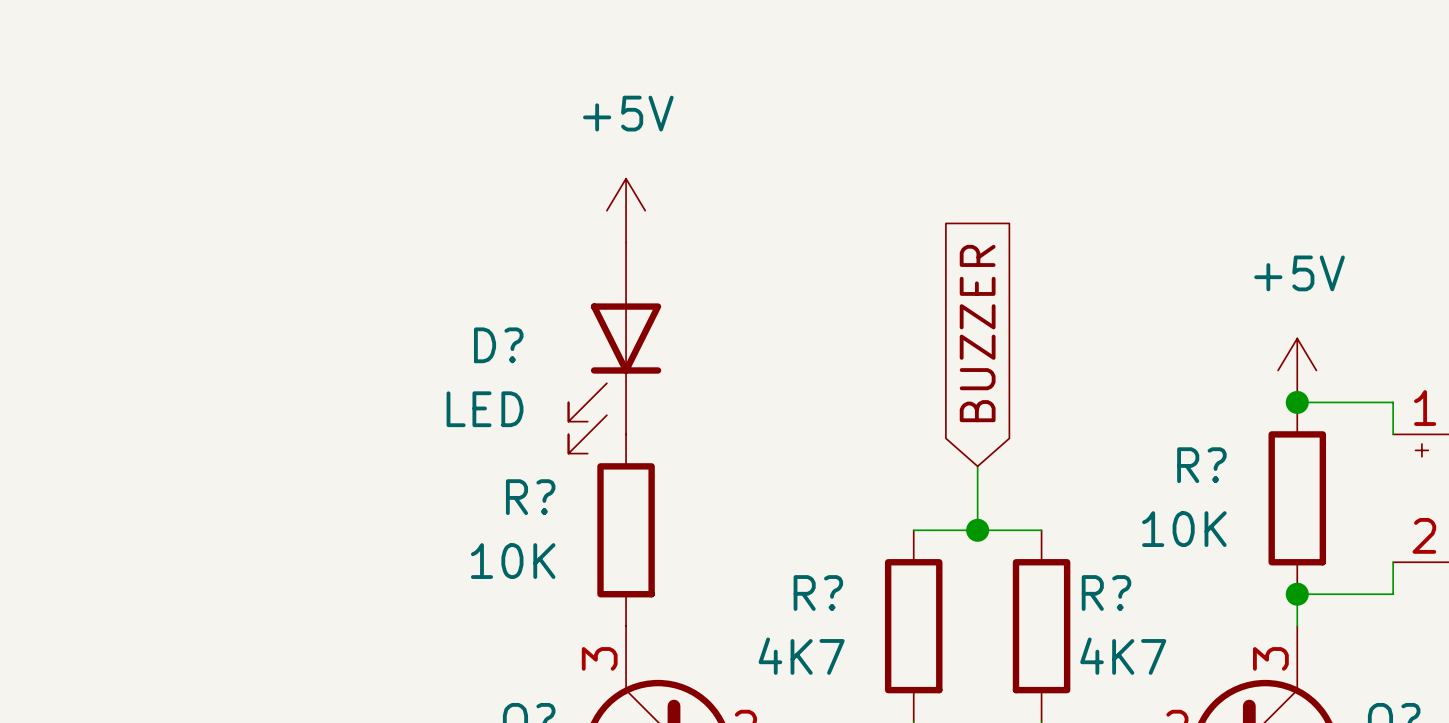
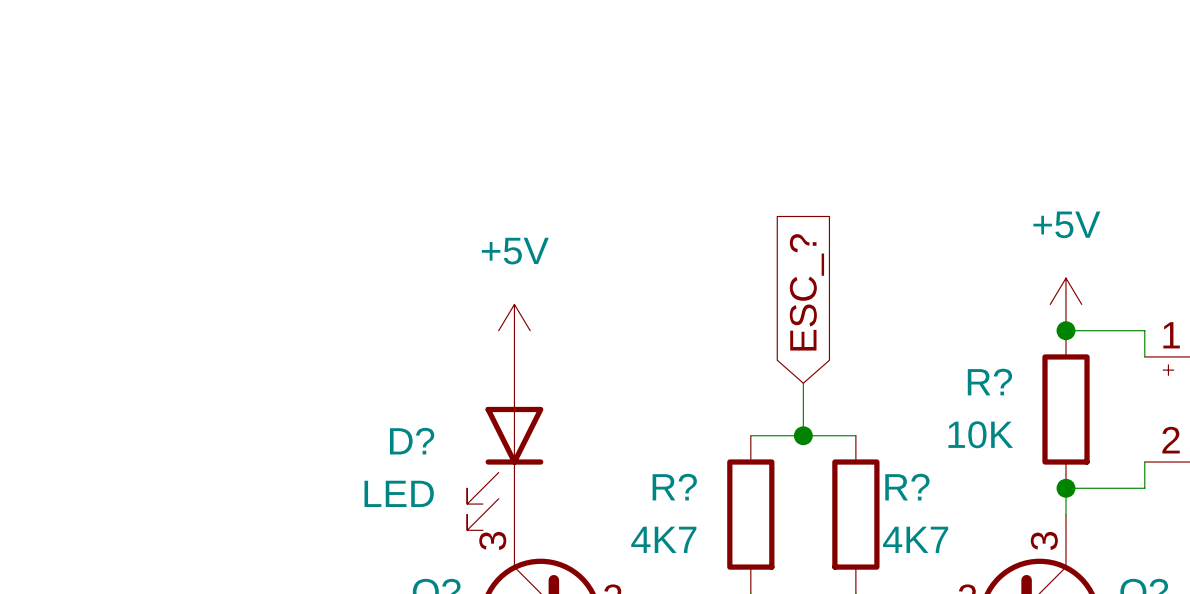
power symbol position: +5V (626, 210) -> +5V (514, 330)
global label: BUZZER (977, 333) -> ESC_? (806, 292)
D? position: (614, 348) -> (505, 443)
R?: 10K (626, 530) -> none

